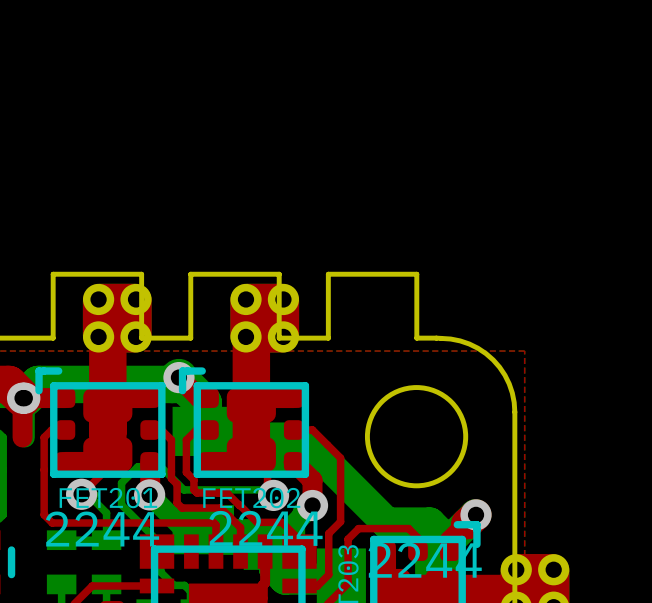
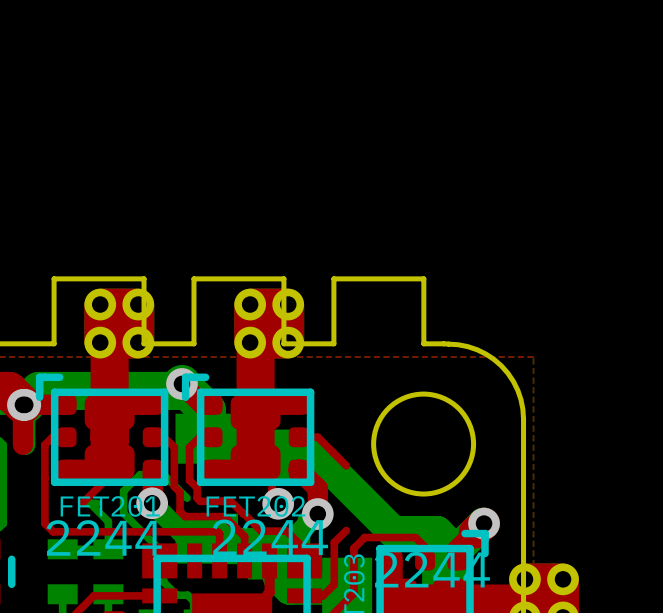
top track: (340, 458) (340, 521) -> none
bottom track: (183, 489) (263, 489) -> none
via: (81, 494) -> none

